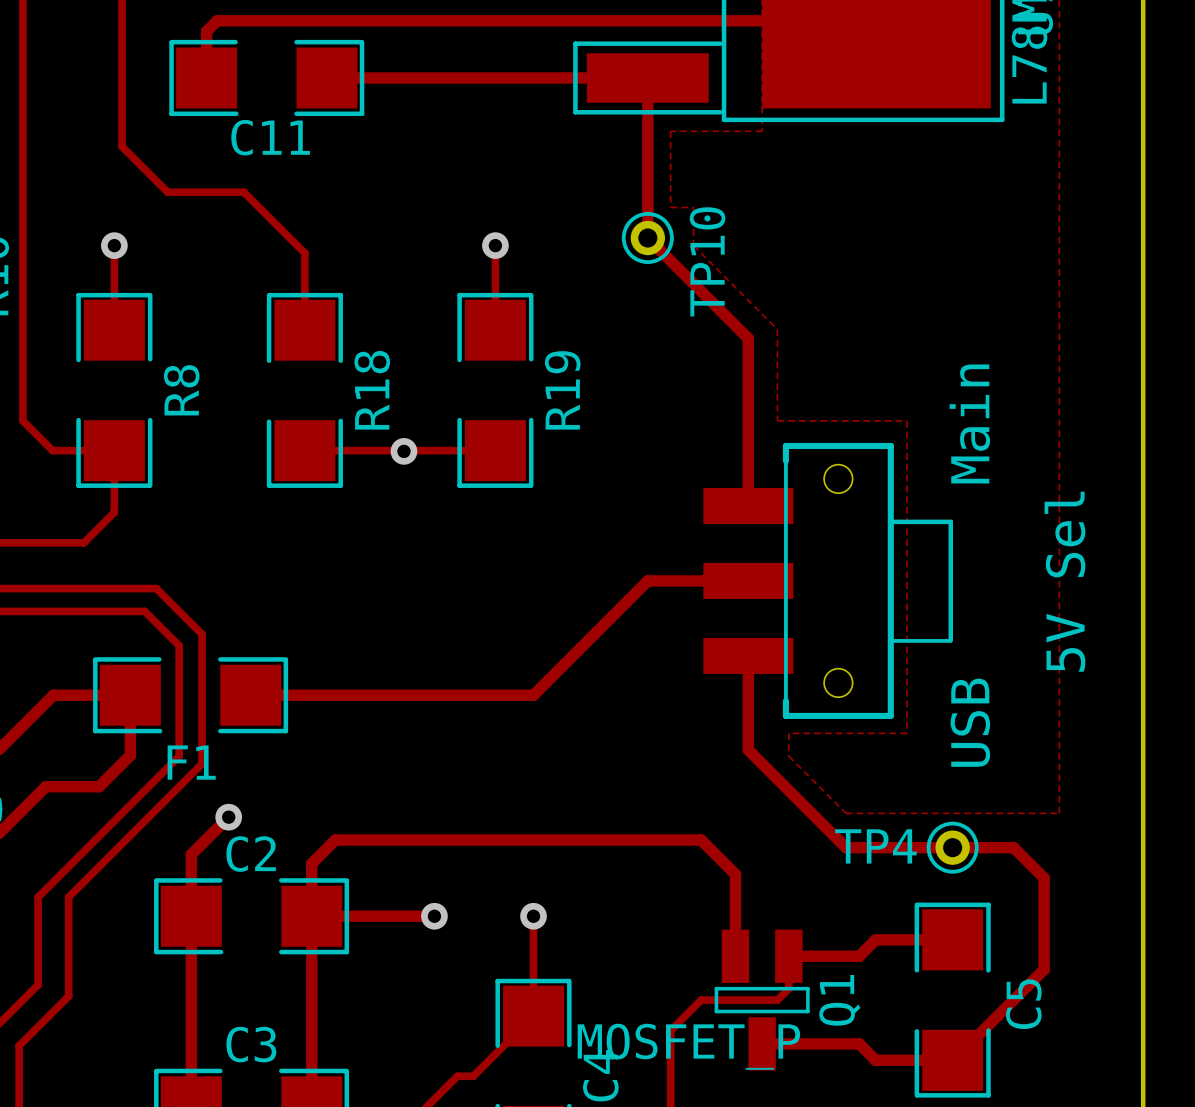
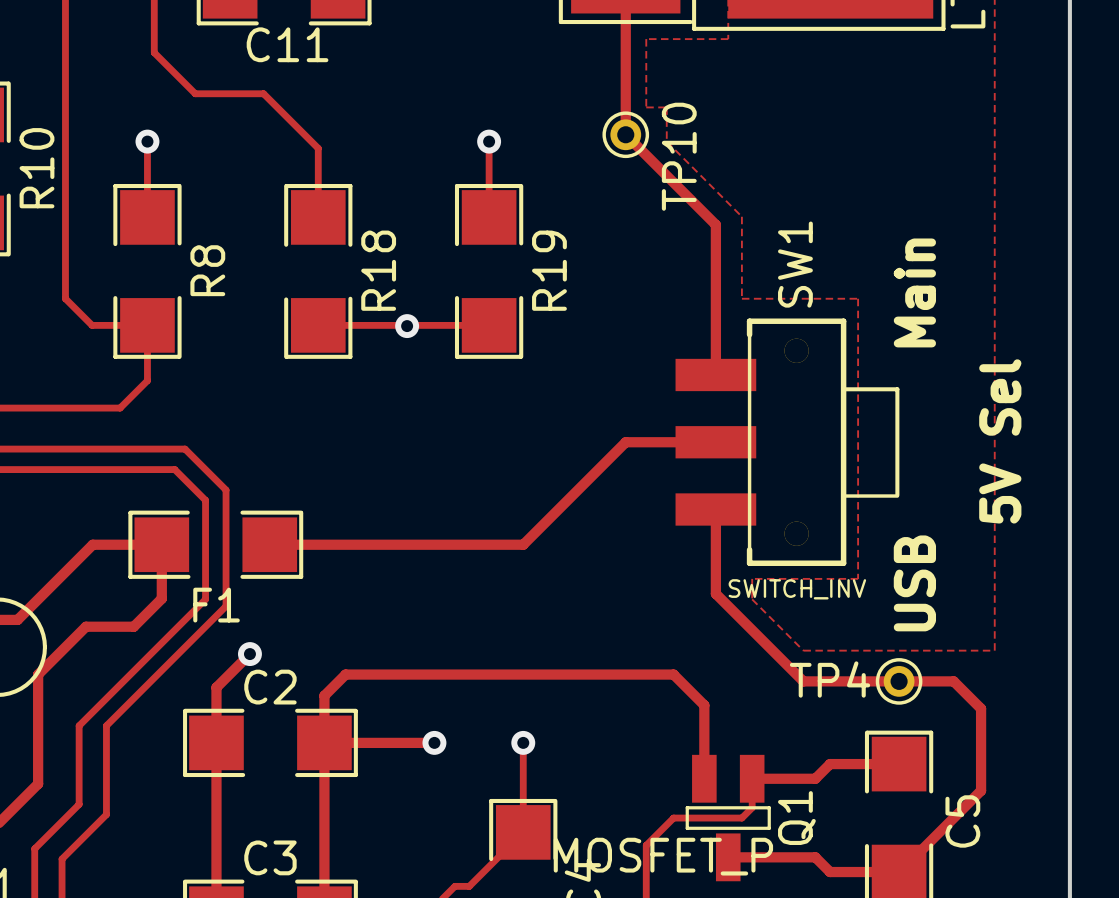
part: (828, 580) -> none
SW1: none -> SWITCH_INV (787, 442)

